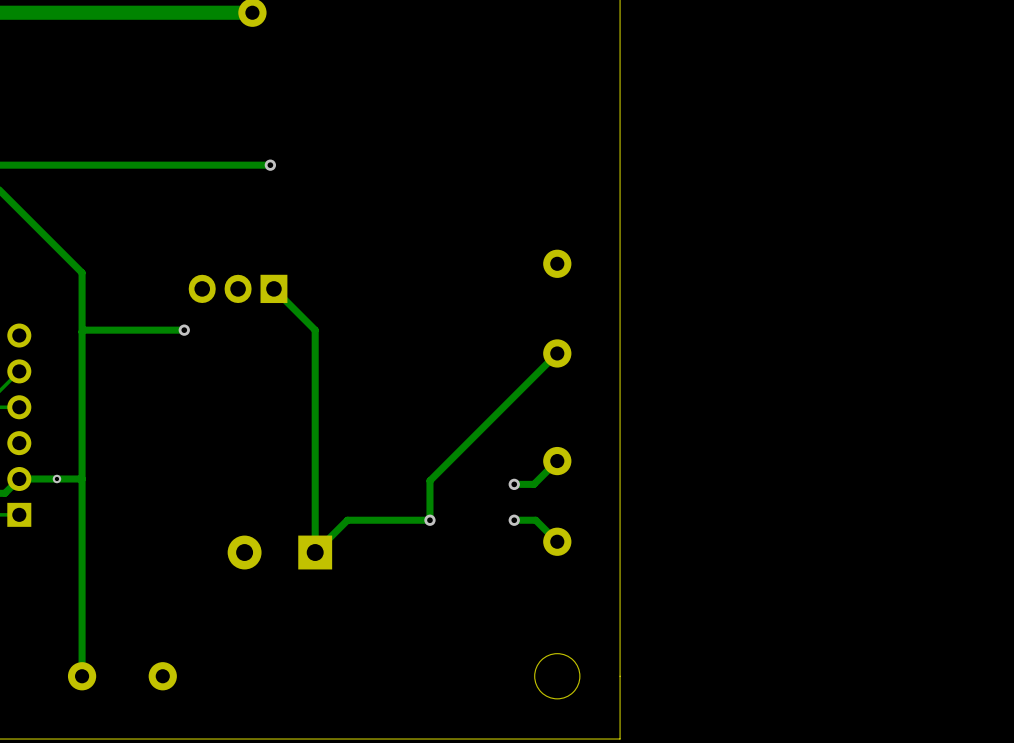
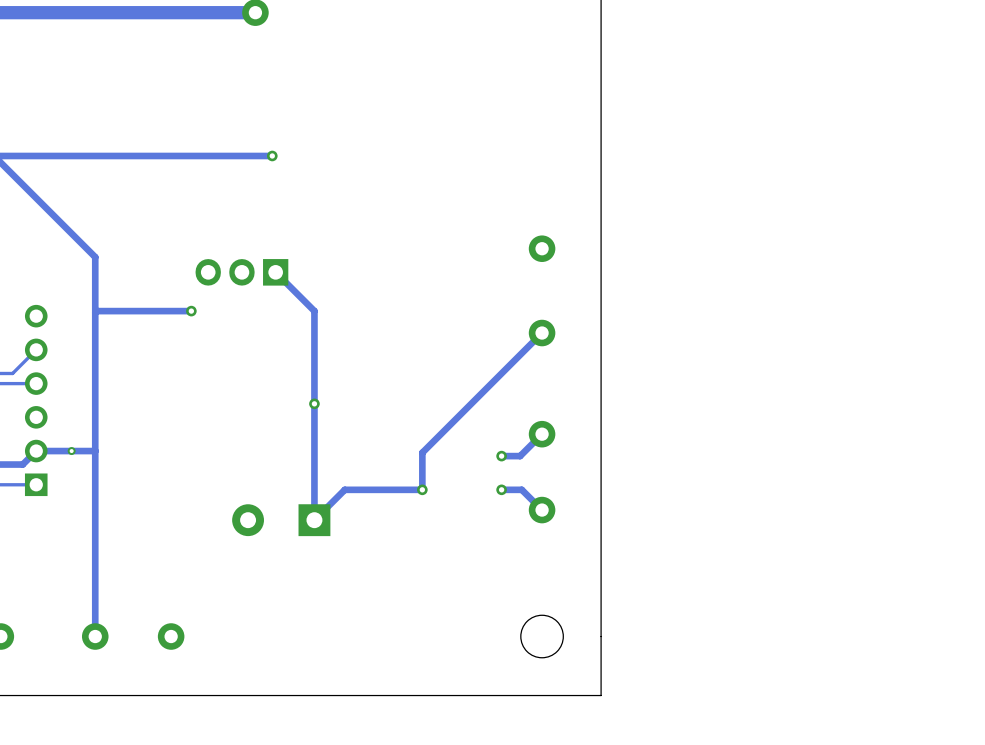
via: none -> (314, 403)

